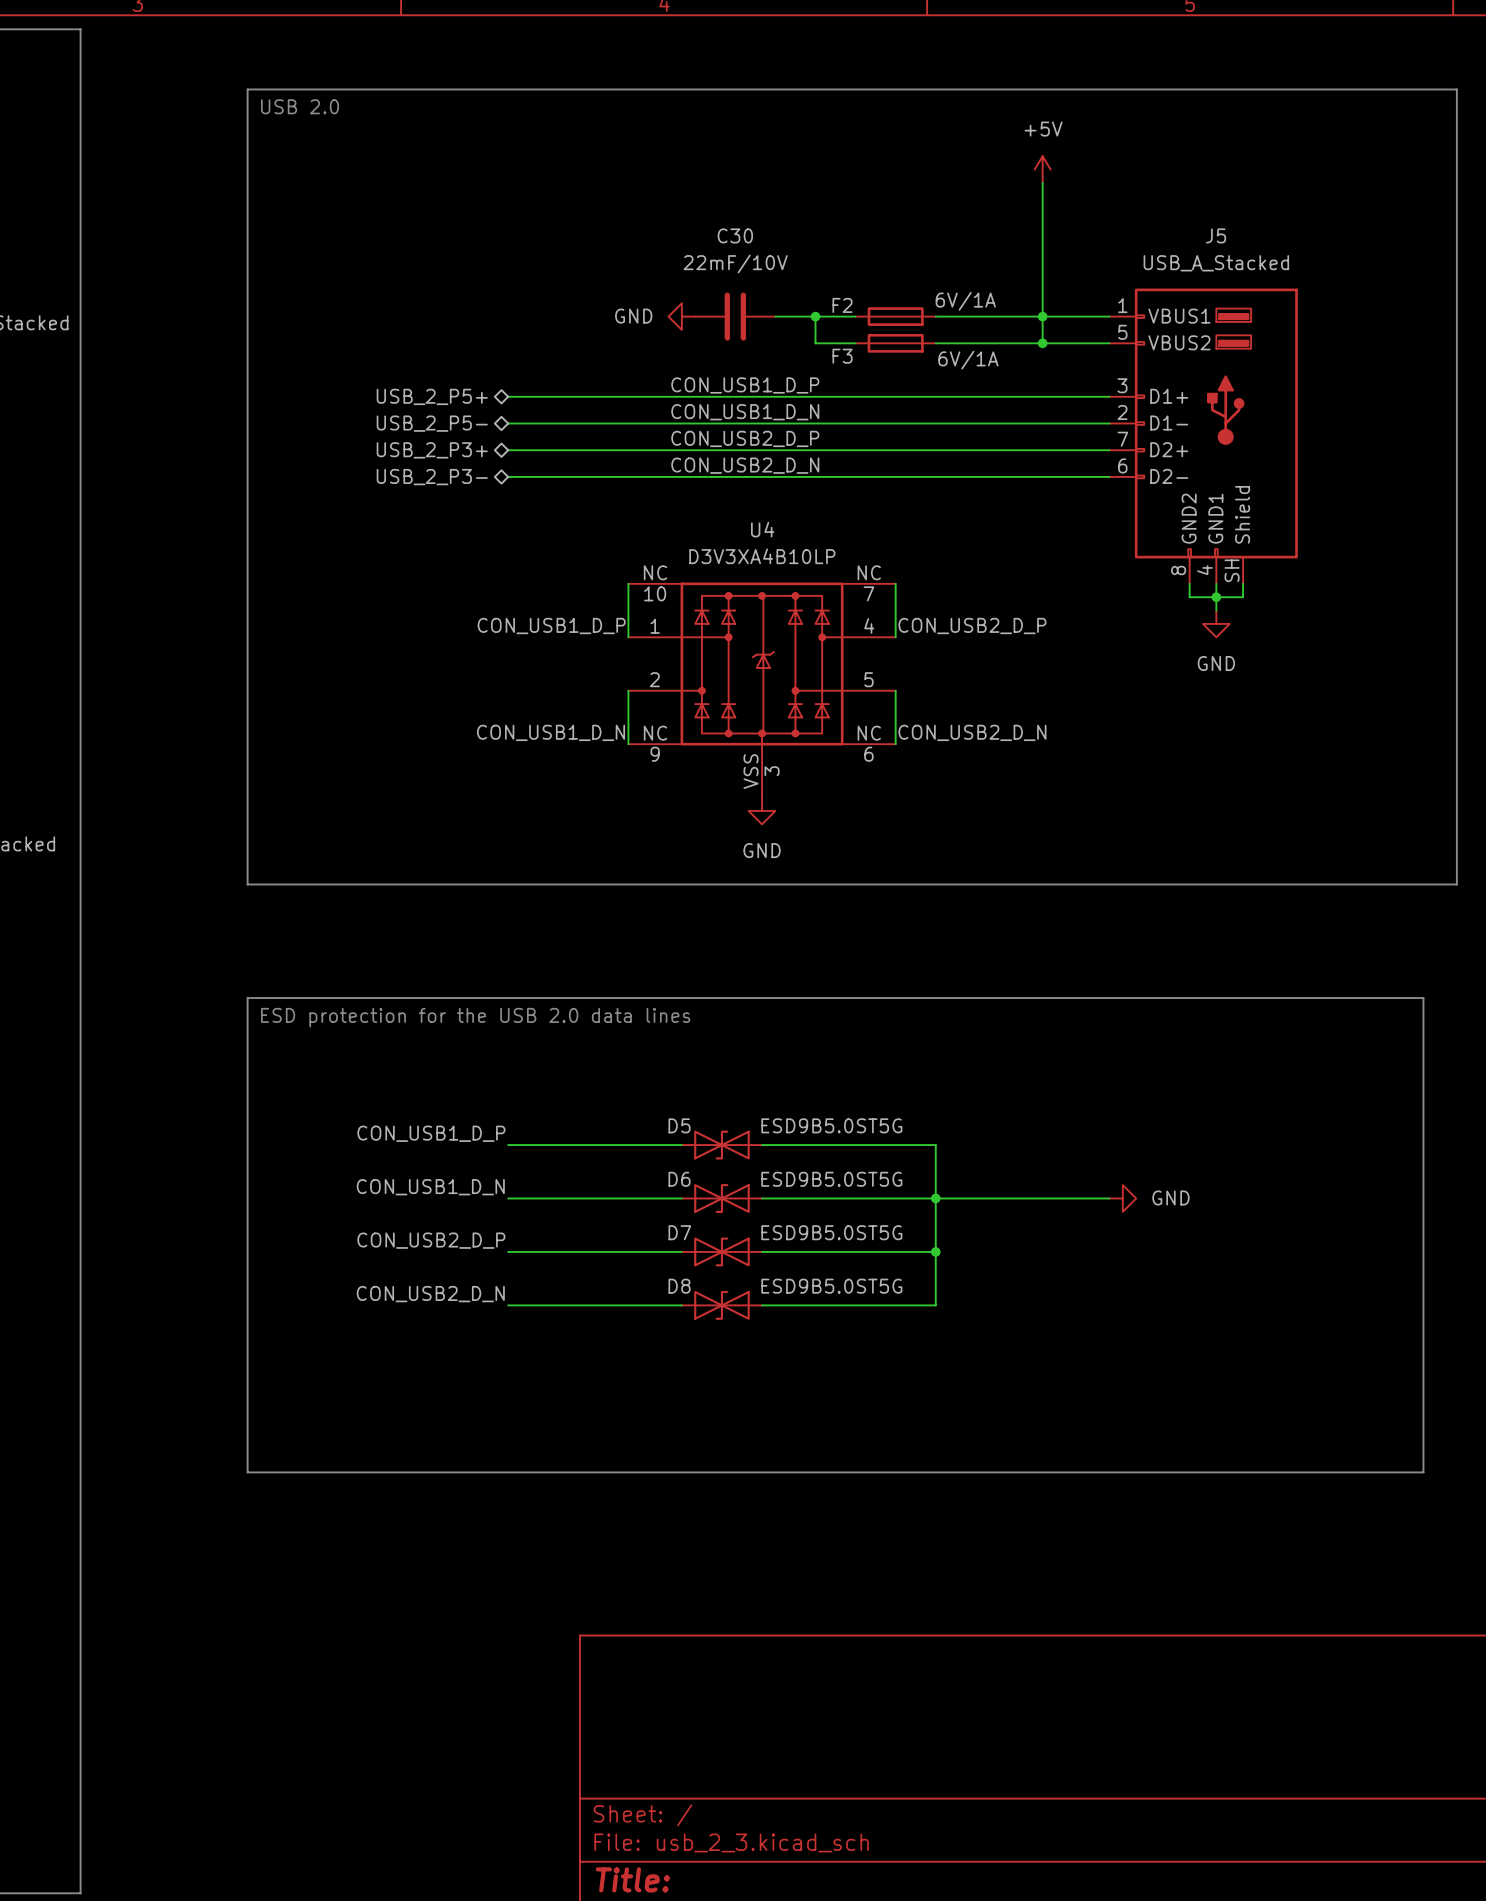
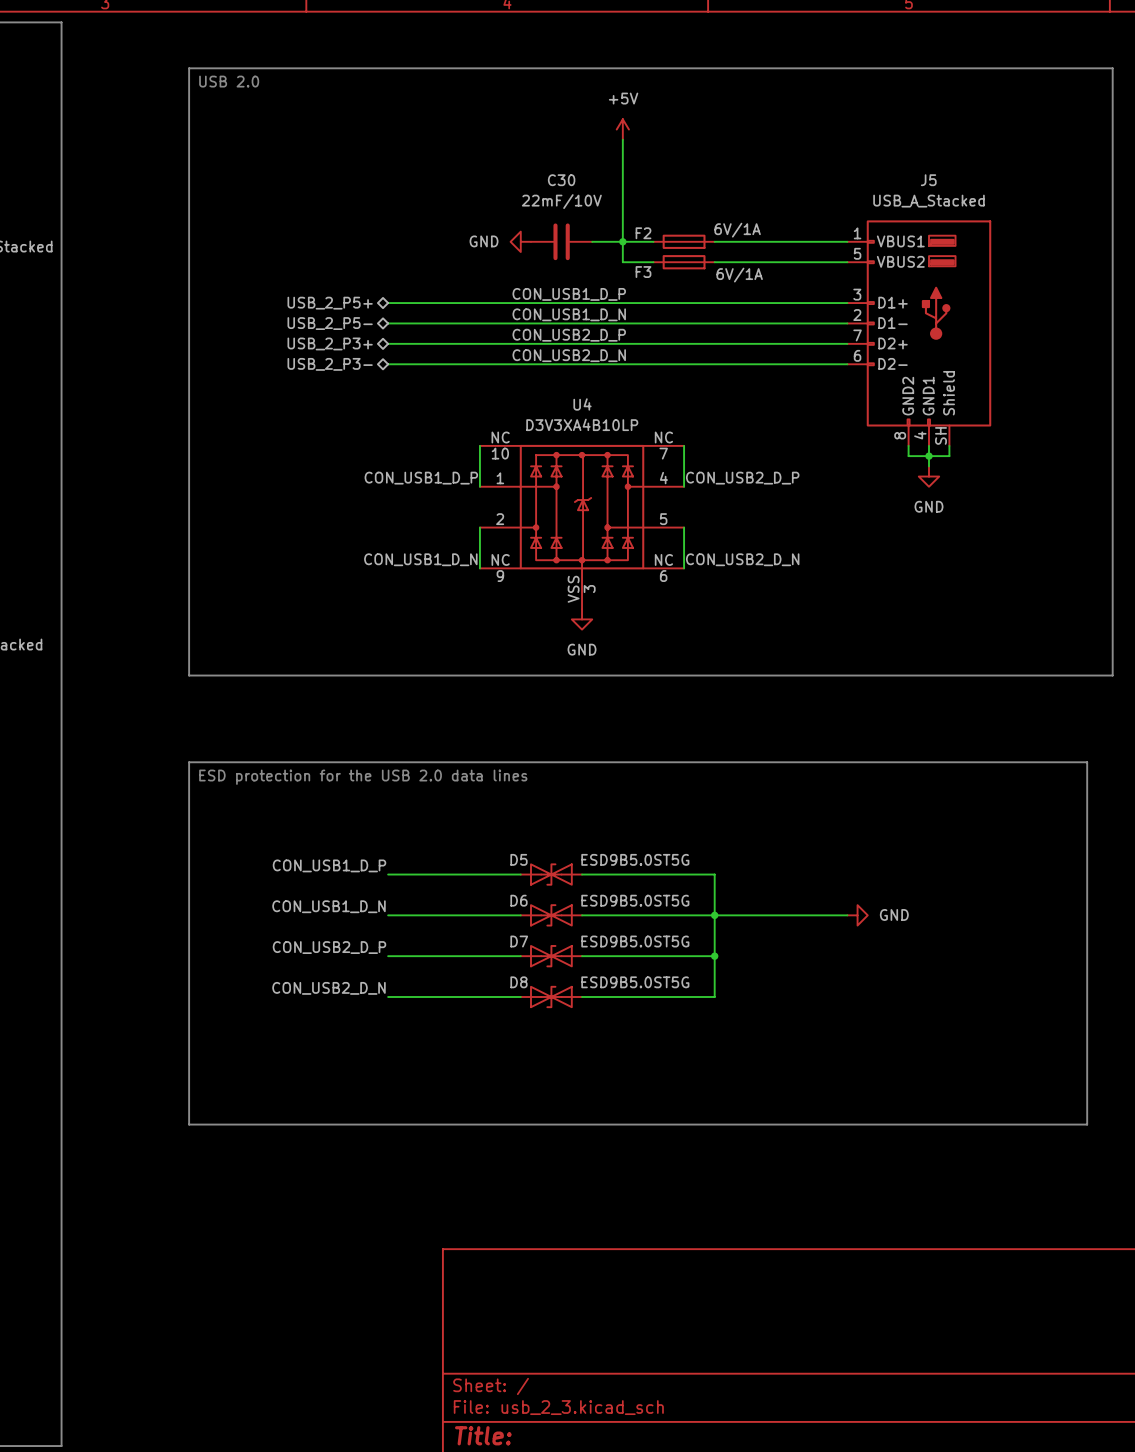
power symbol position: +5V (1042, 169) -> +5V (622, 129)
wire: none -> (622, 139) (622, 241)
wire: (1042, 182) (1042, 343) -> none
junction: (1042, 316) -> none
junction: (1042, 343) -> none

